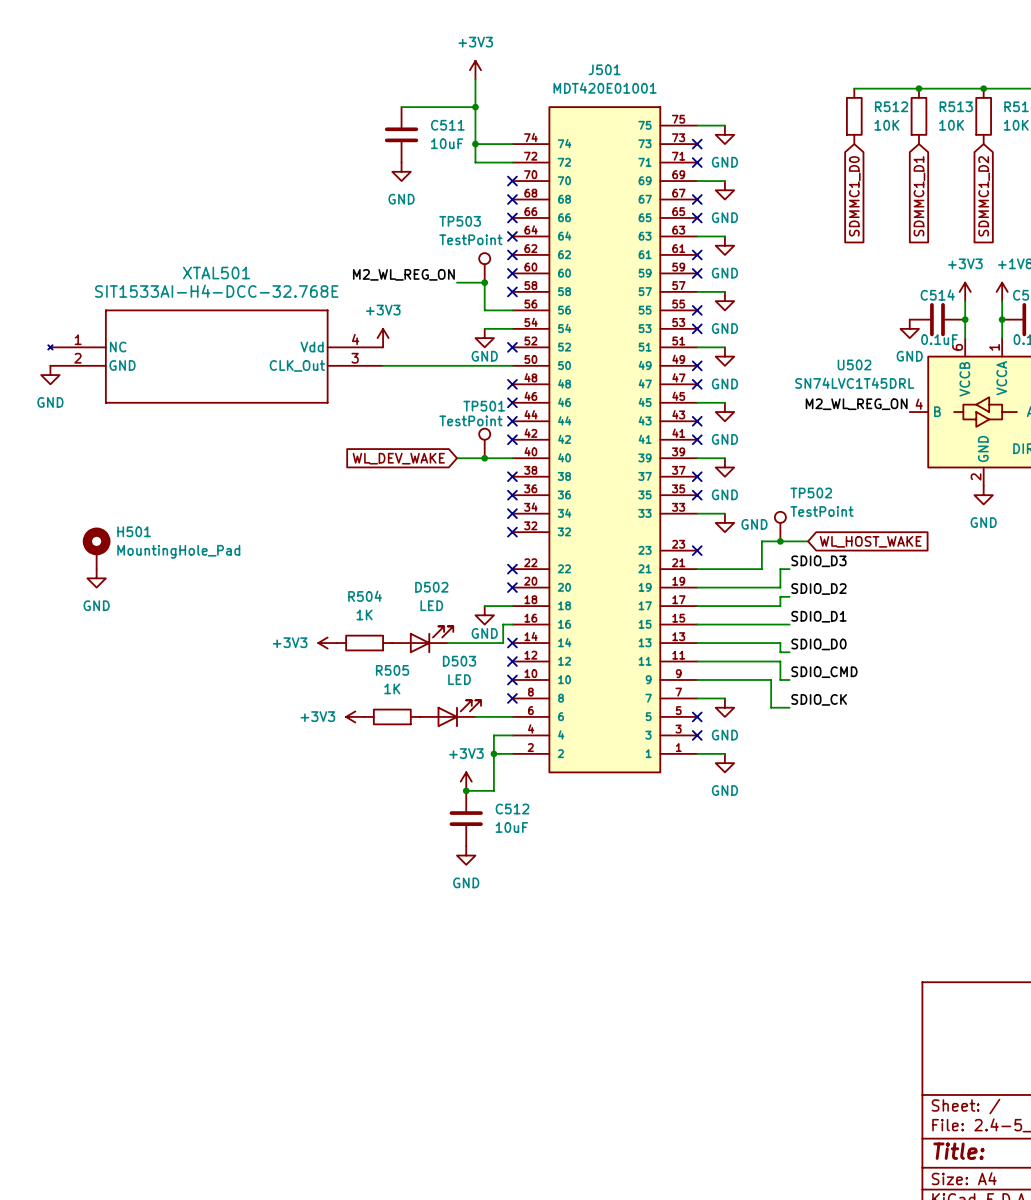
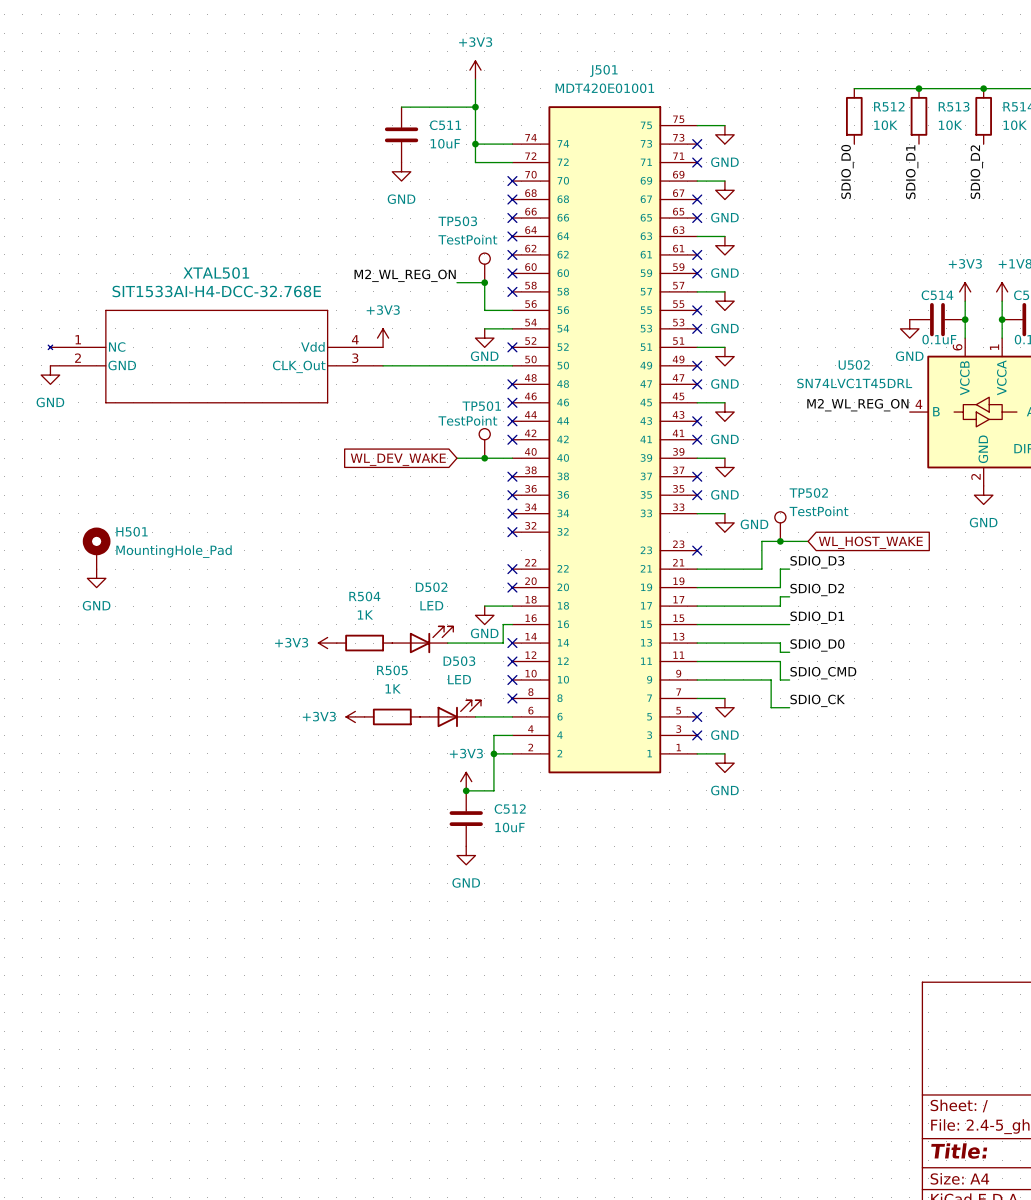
label: none -> SDIO_D0 (847, 171)
label: none -> SDIO_D1 (912, 172)
label: none -> SDIO_D2 (976, 172)
global label: SDMMC1_D0 (854, 196) -> none
global label: SDMMC1_D1 (919, 196) -> none
global label: SDMMC1_D2 (984, 196) -> none

